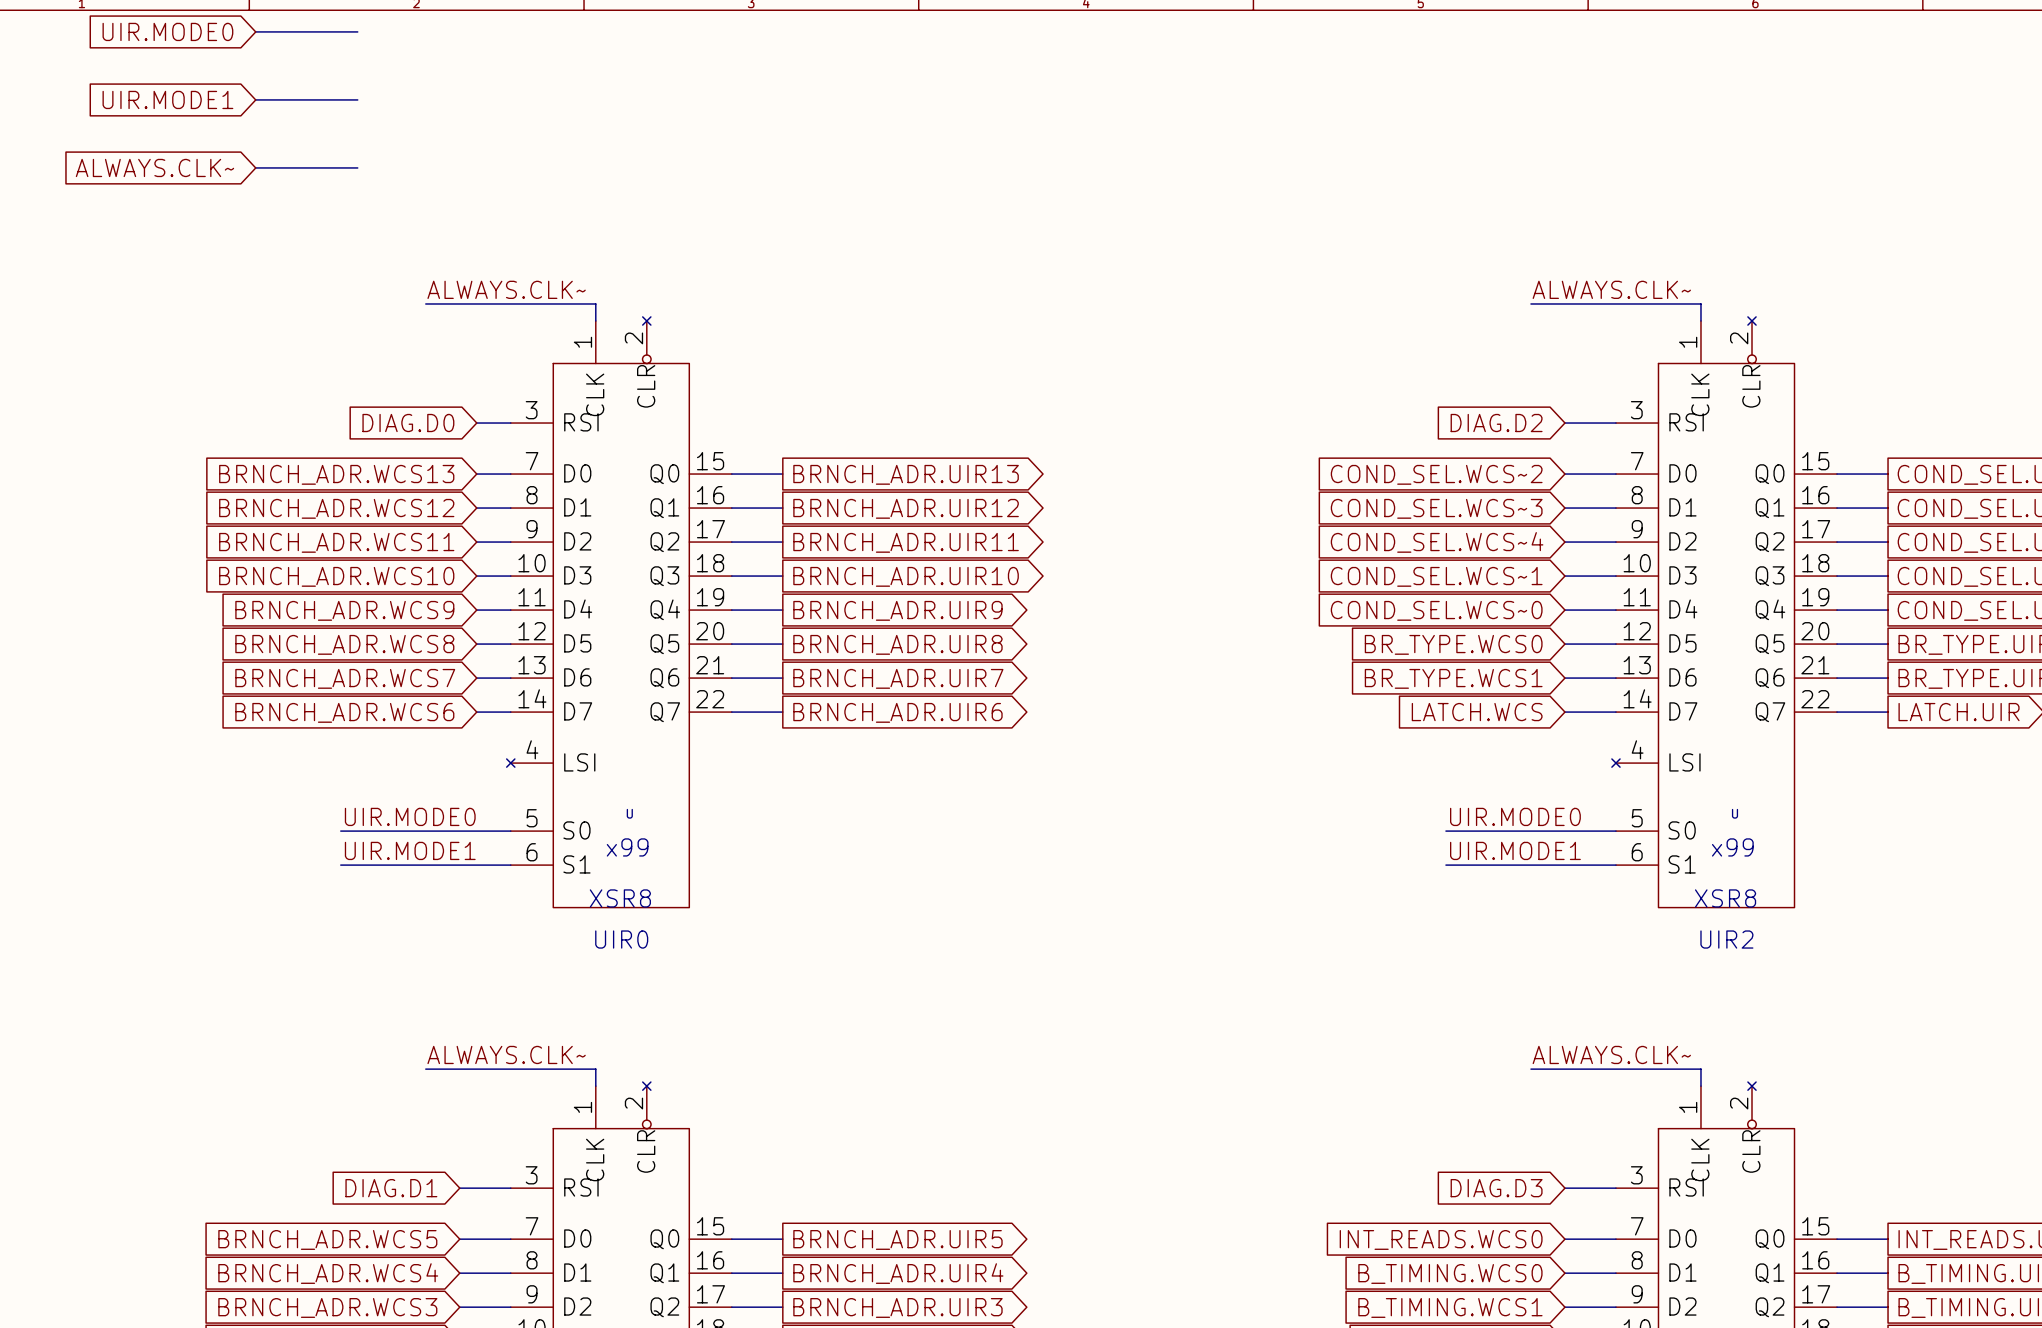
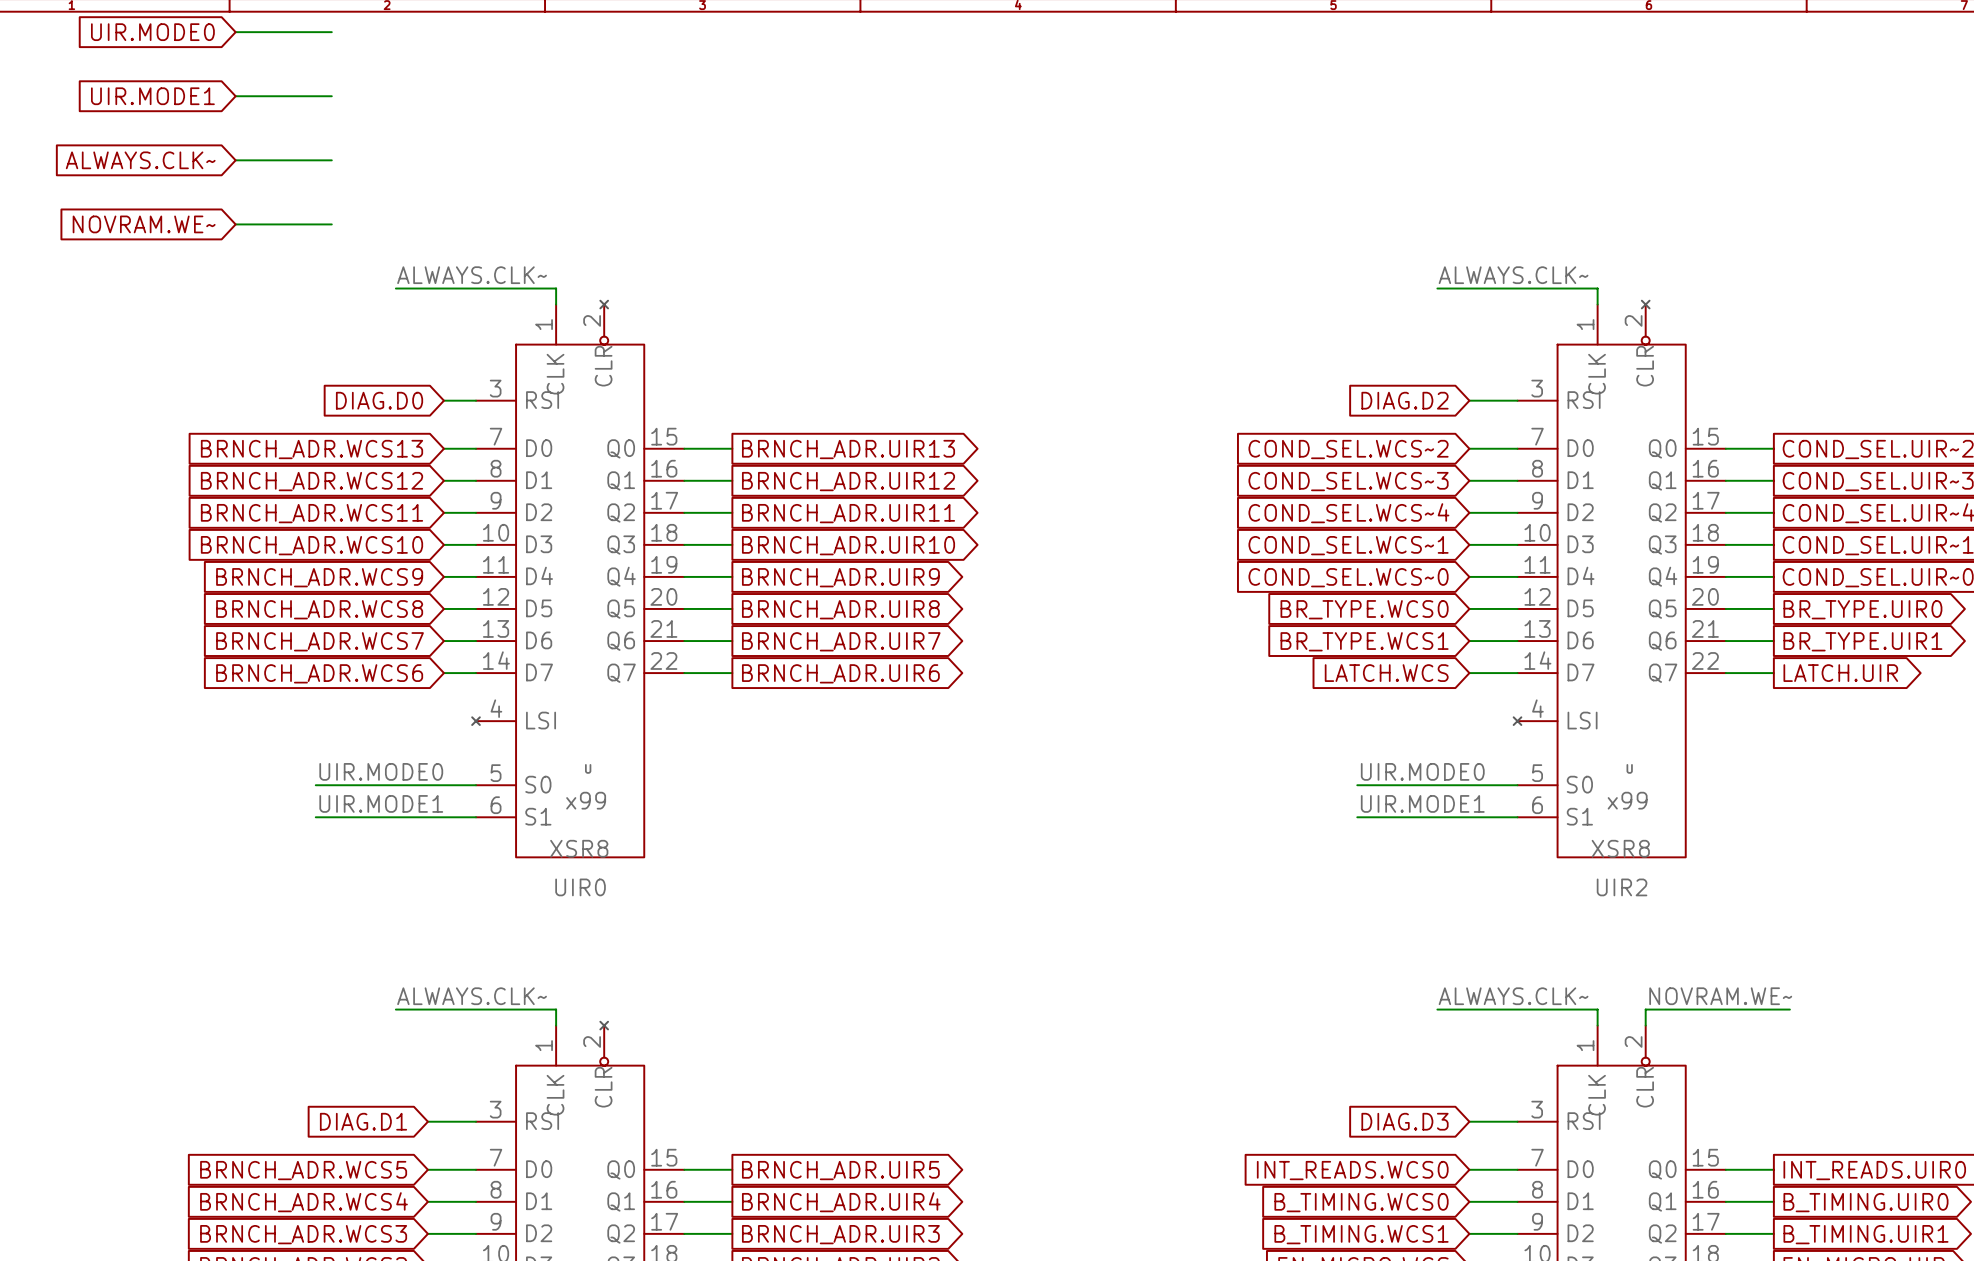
global label: none -> NOVRAM.WE~ (144, 224)
wire: none -> (235, 224) (331, 224)
label: none -> NOVRAM.WE~ (1720, 996)
wire: none -> (1789, 1009) (1645, 1009) (1645, 1025)
no-connect mark: (1752, 1086) -> none

